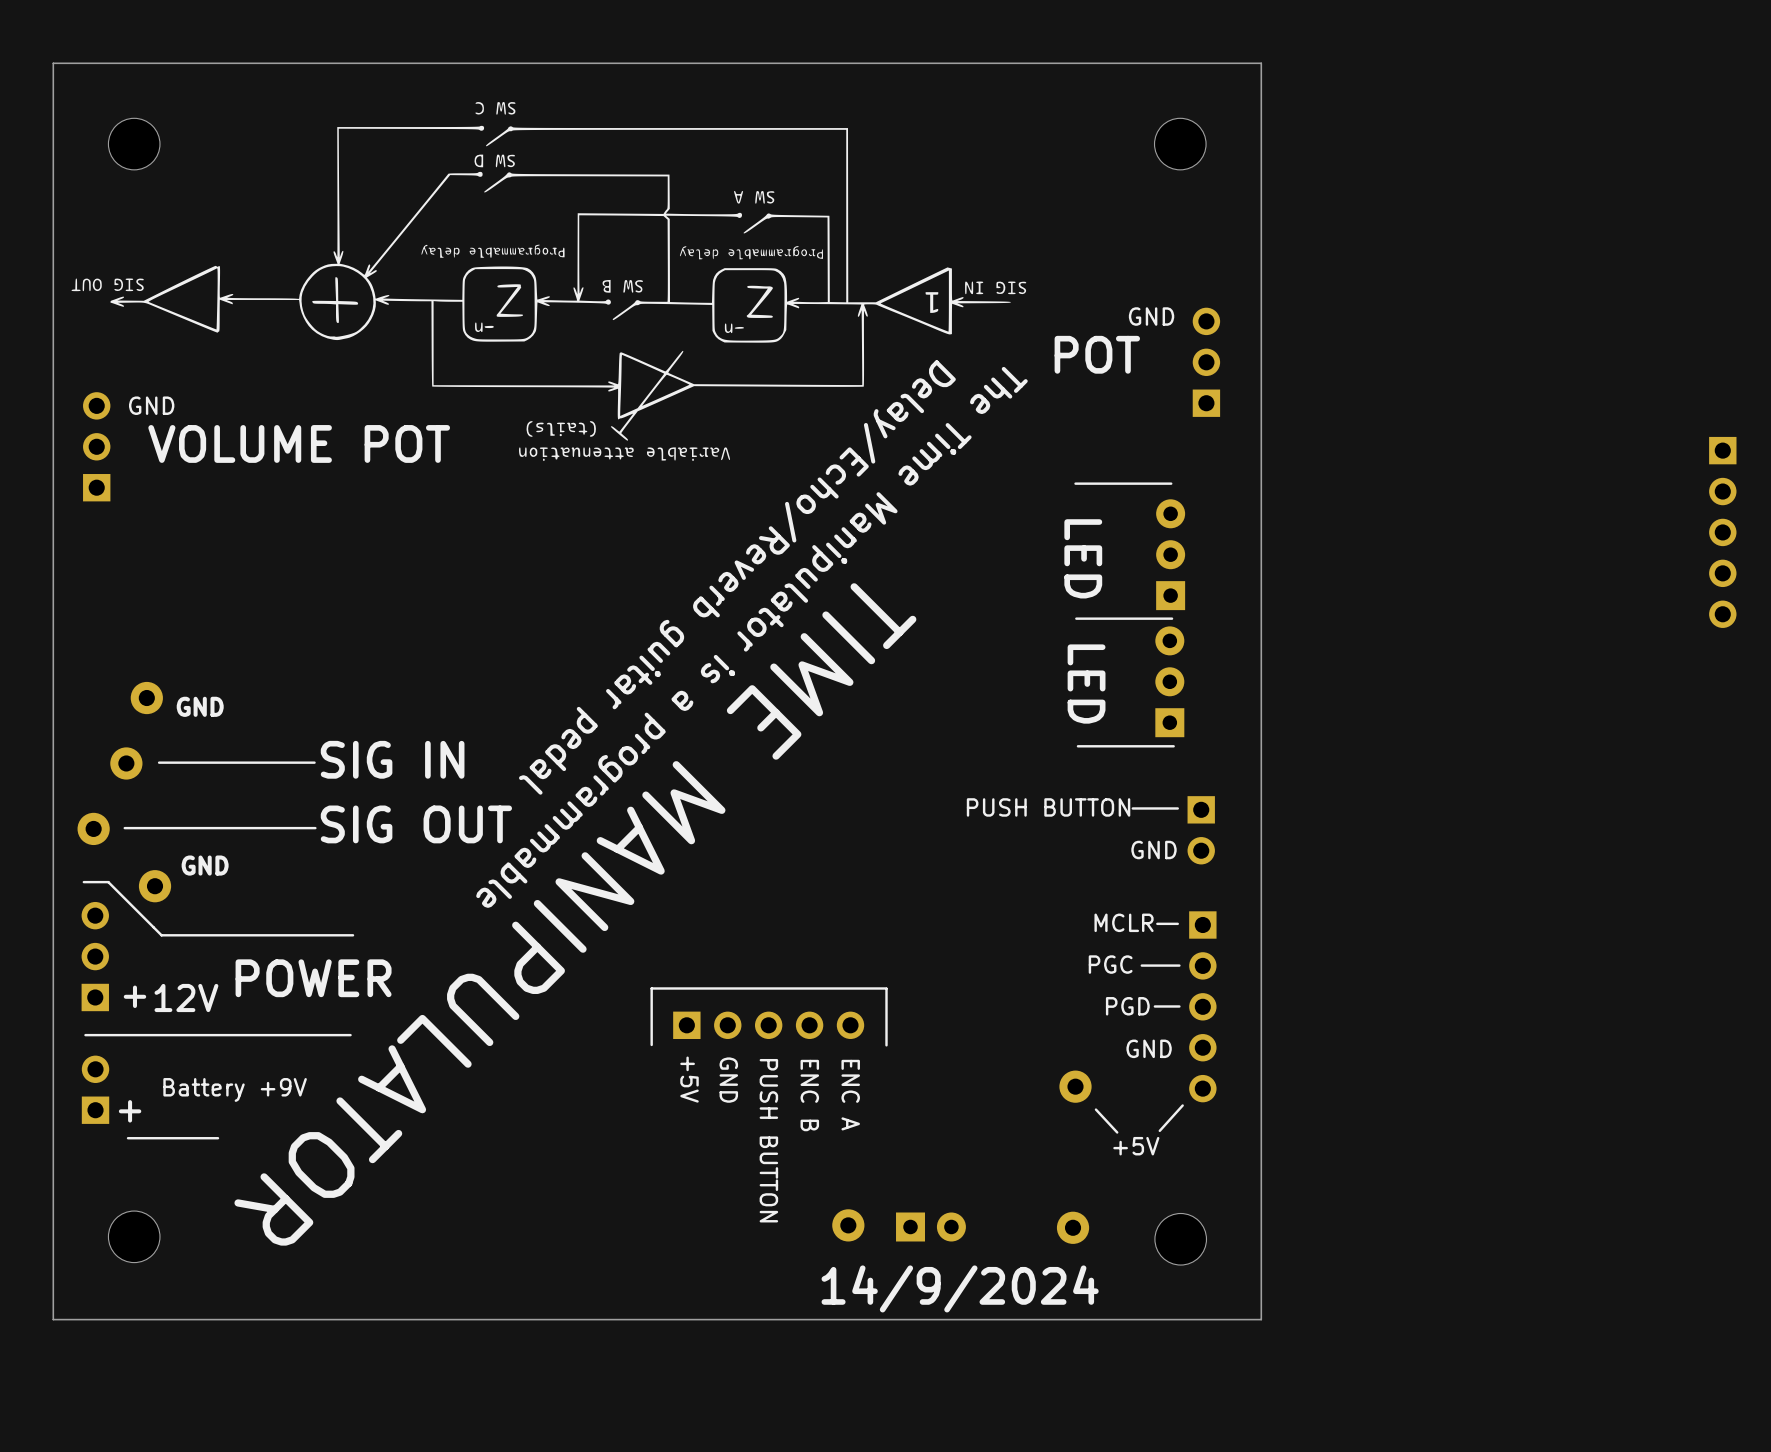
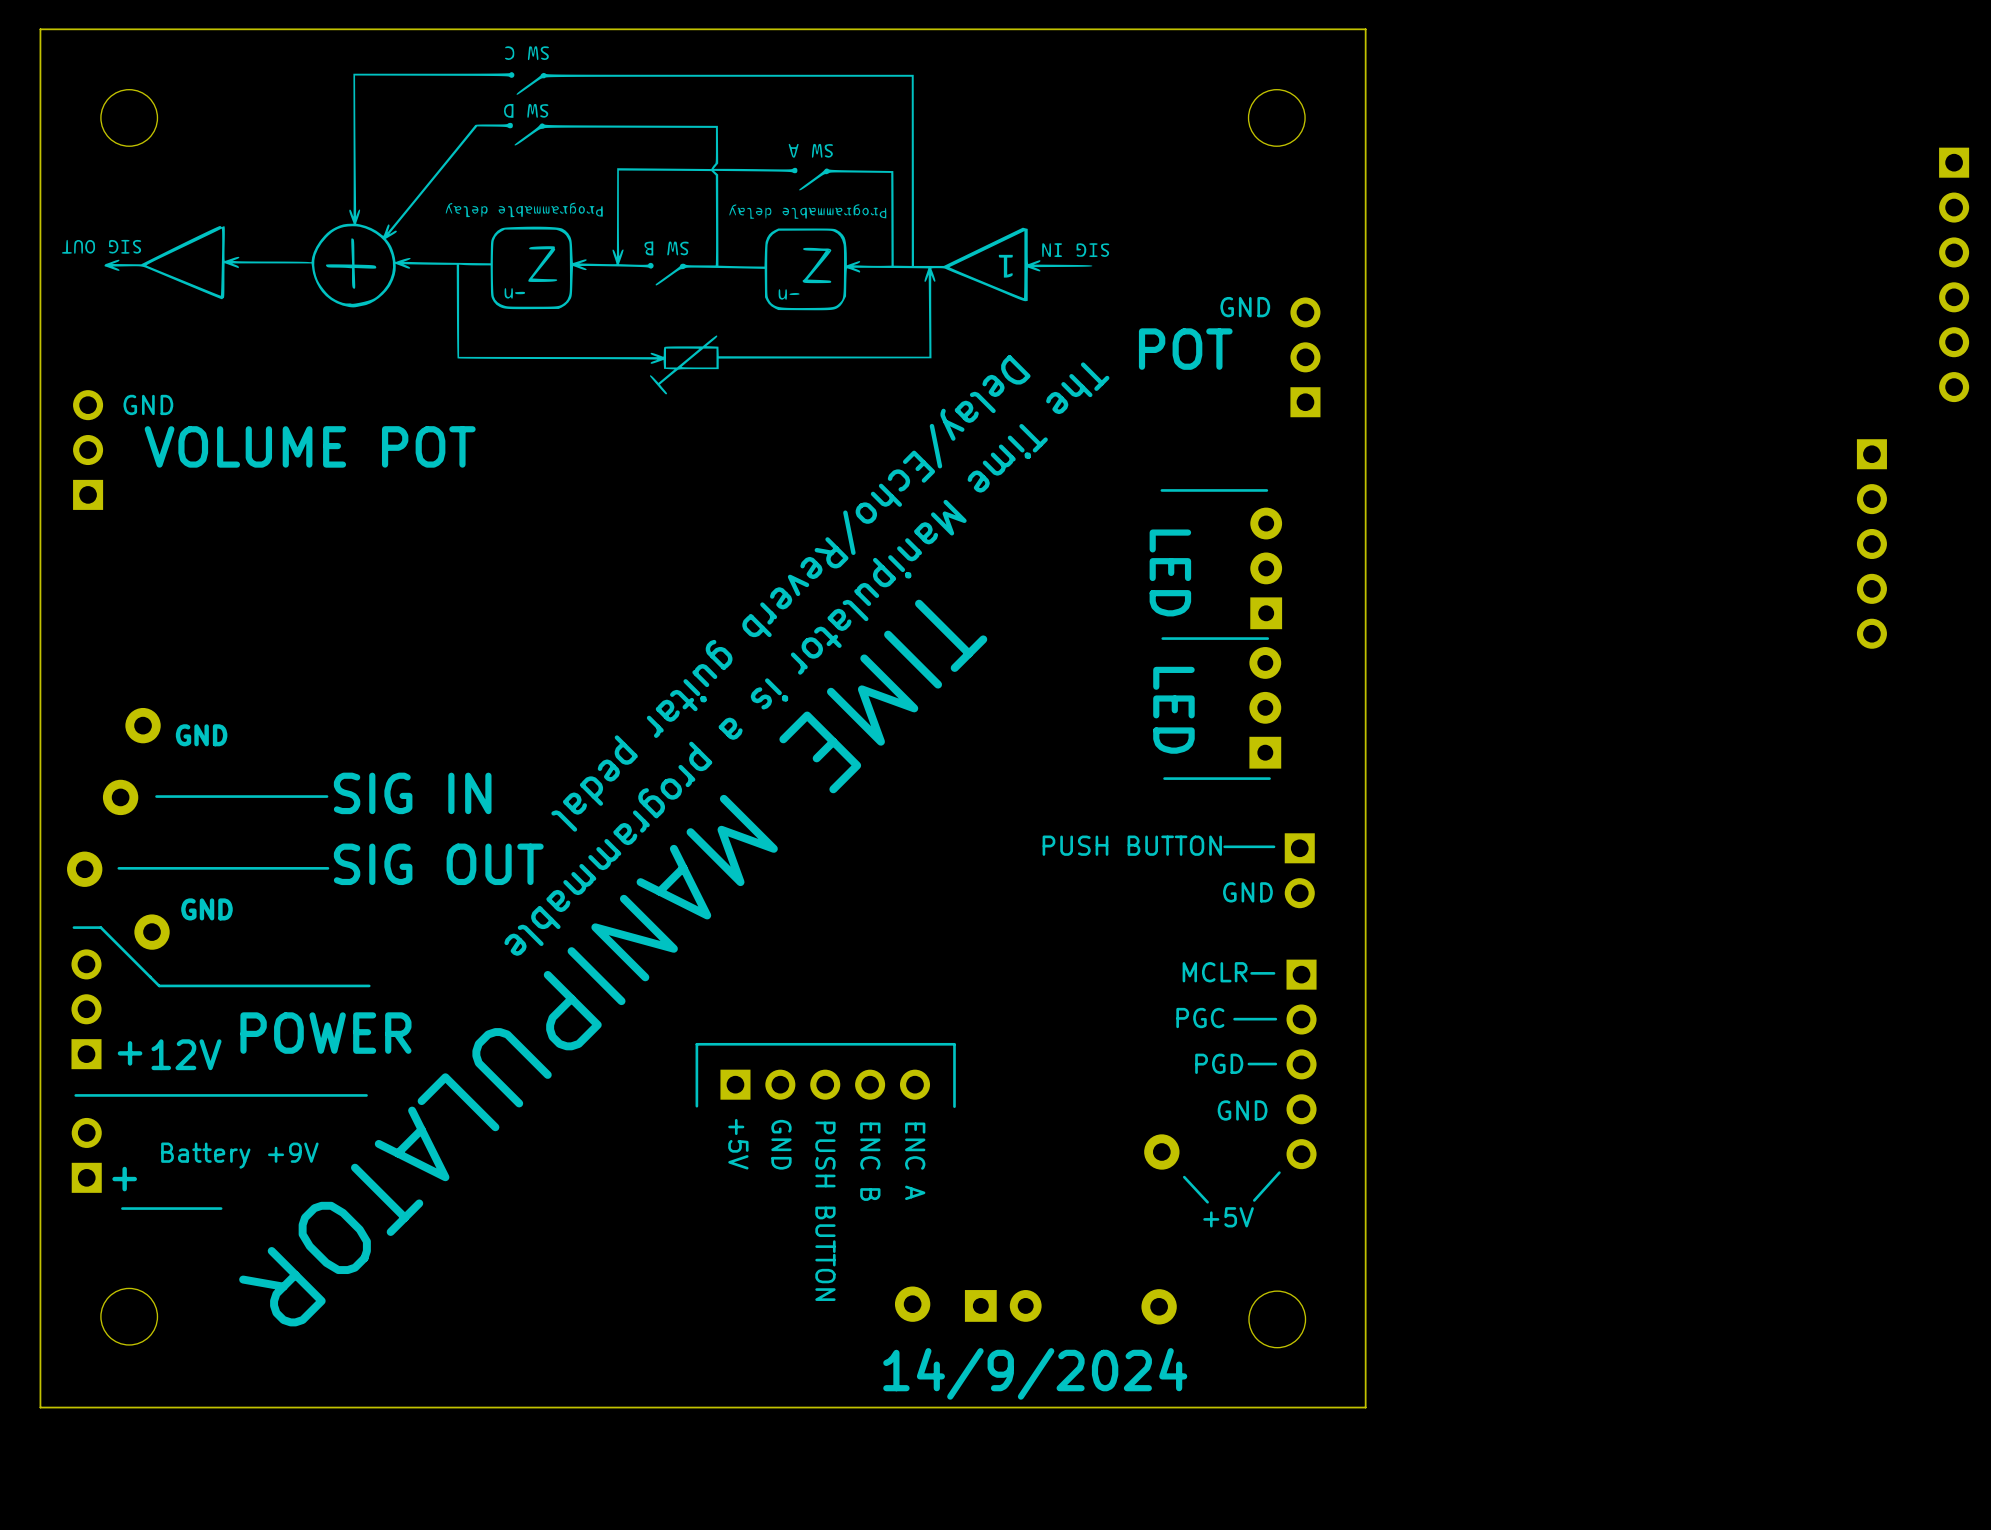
drawing: none -> [61, 46, 1110, 395]
drawing: [71, 102, 1027, 461] -> none

